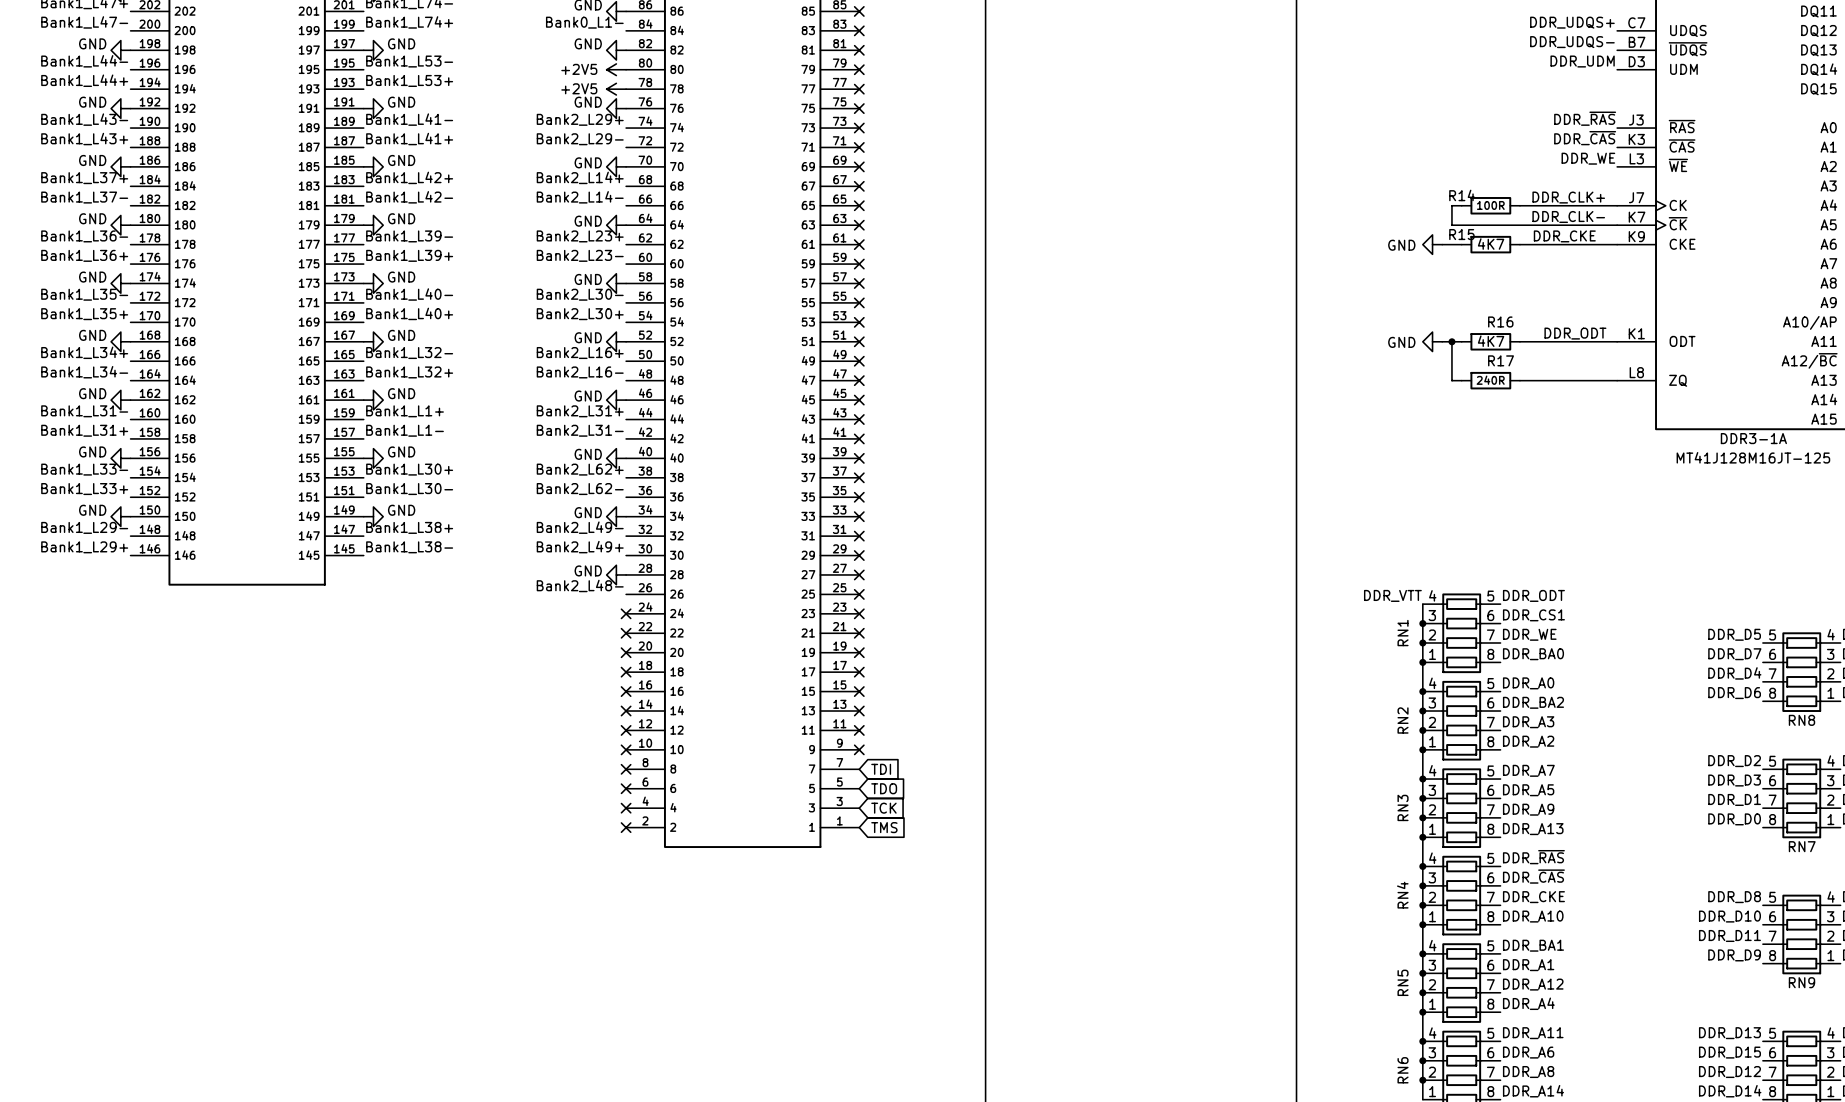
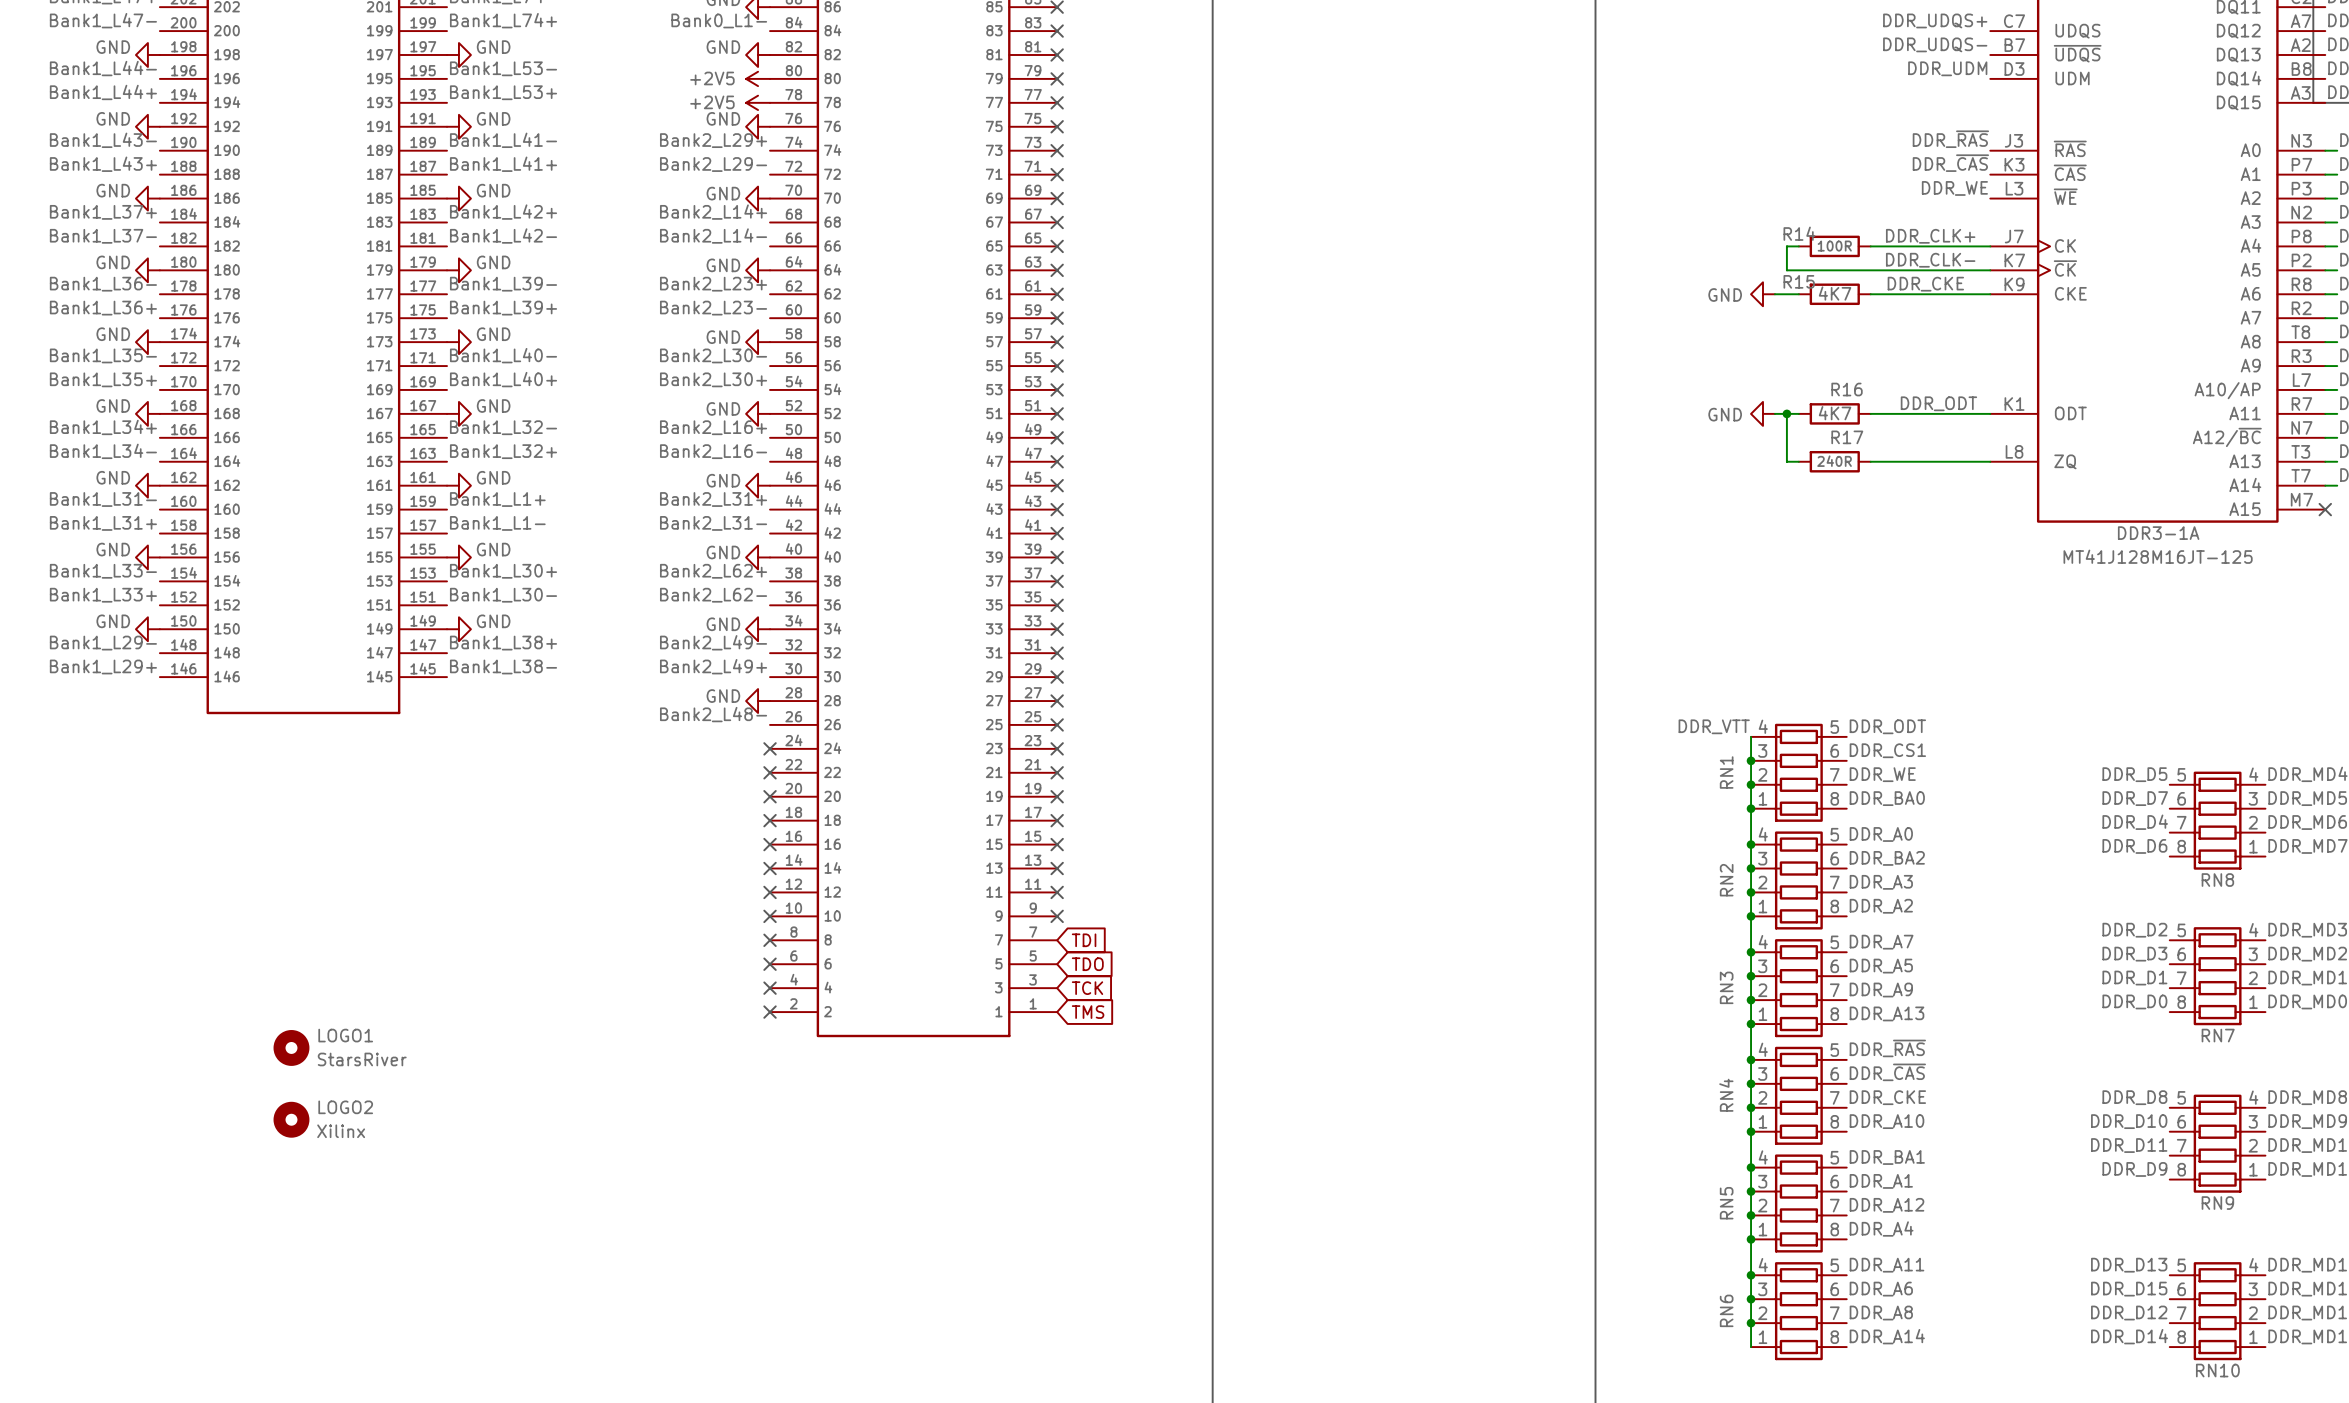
LOGO1: none -> StarsRiver (291, 1047)
LOGO2: none -> Xilinx (291, 1119)

